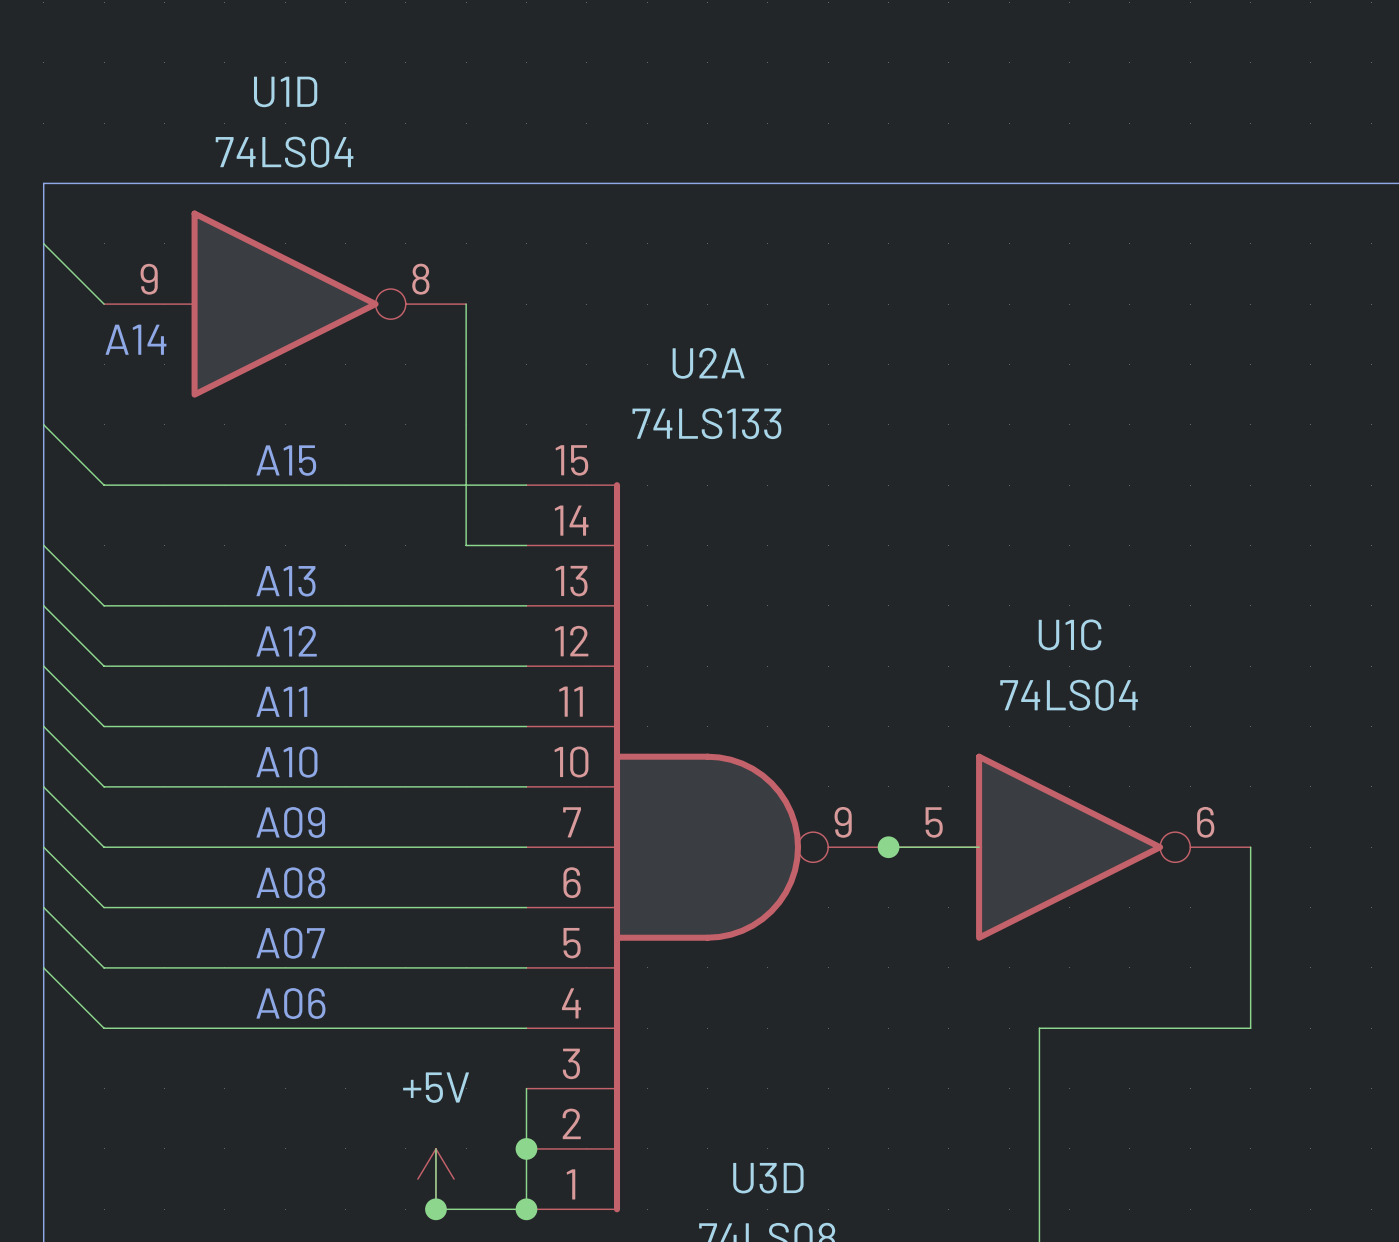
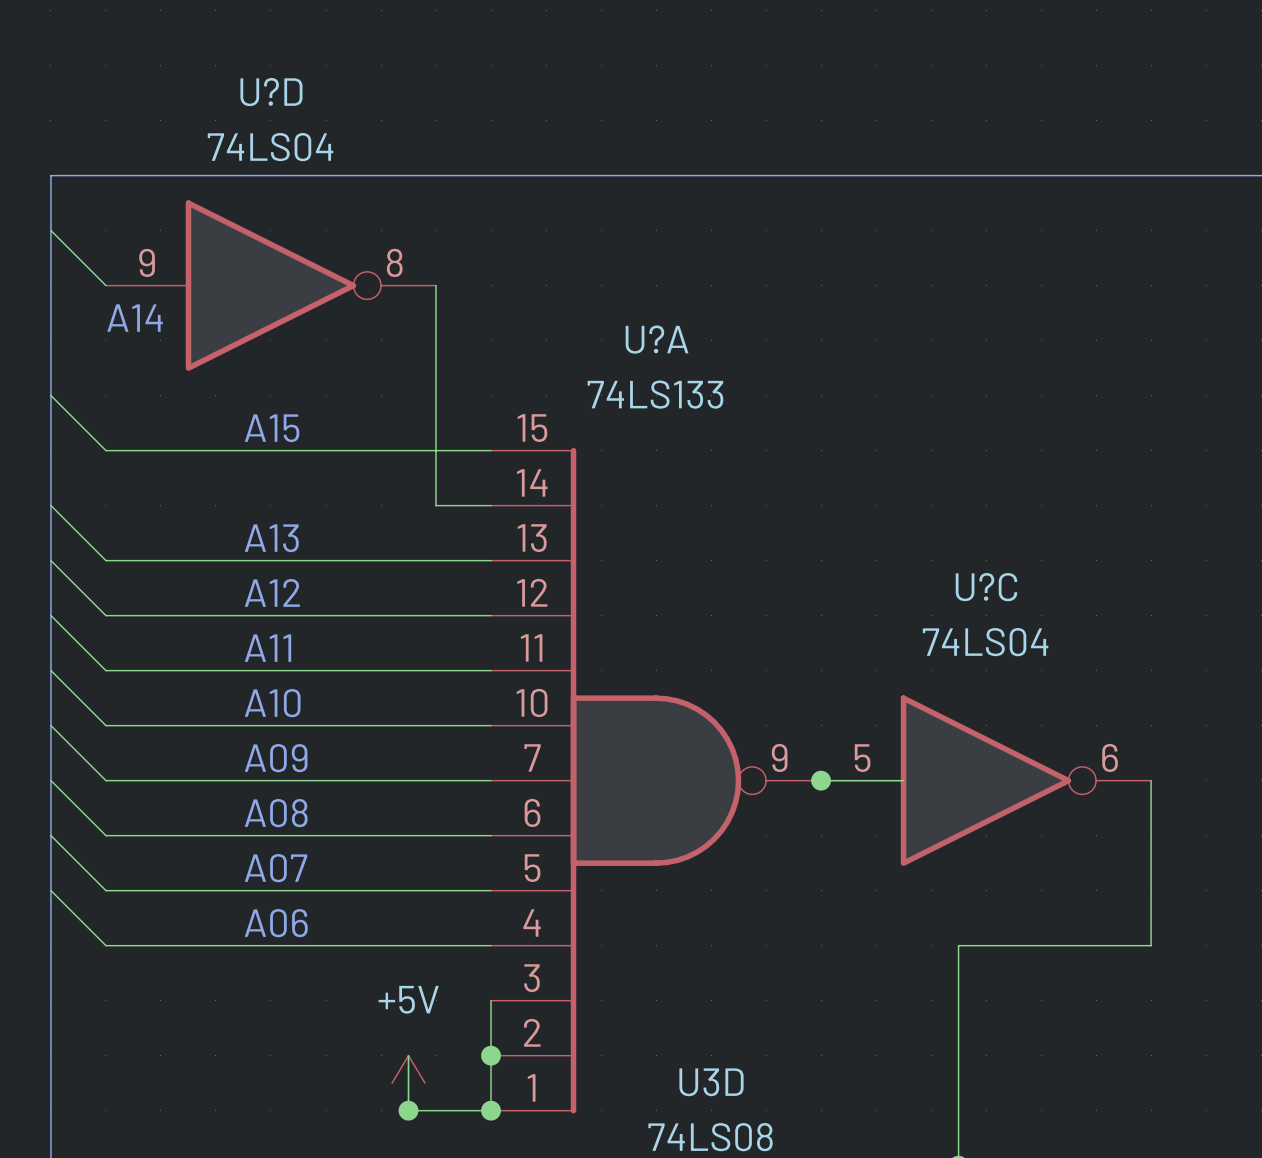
U1D name: U1D (285, 91) -> U?D (271, 92)
U2A name: U2A (708, 363) -> U?A (657, 339)
U1C name: U1C (1070, 634) -> U?C (986, 587)

